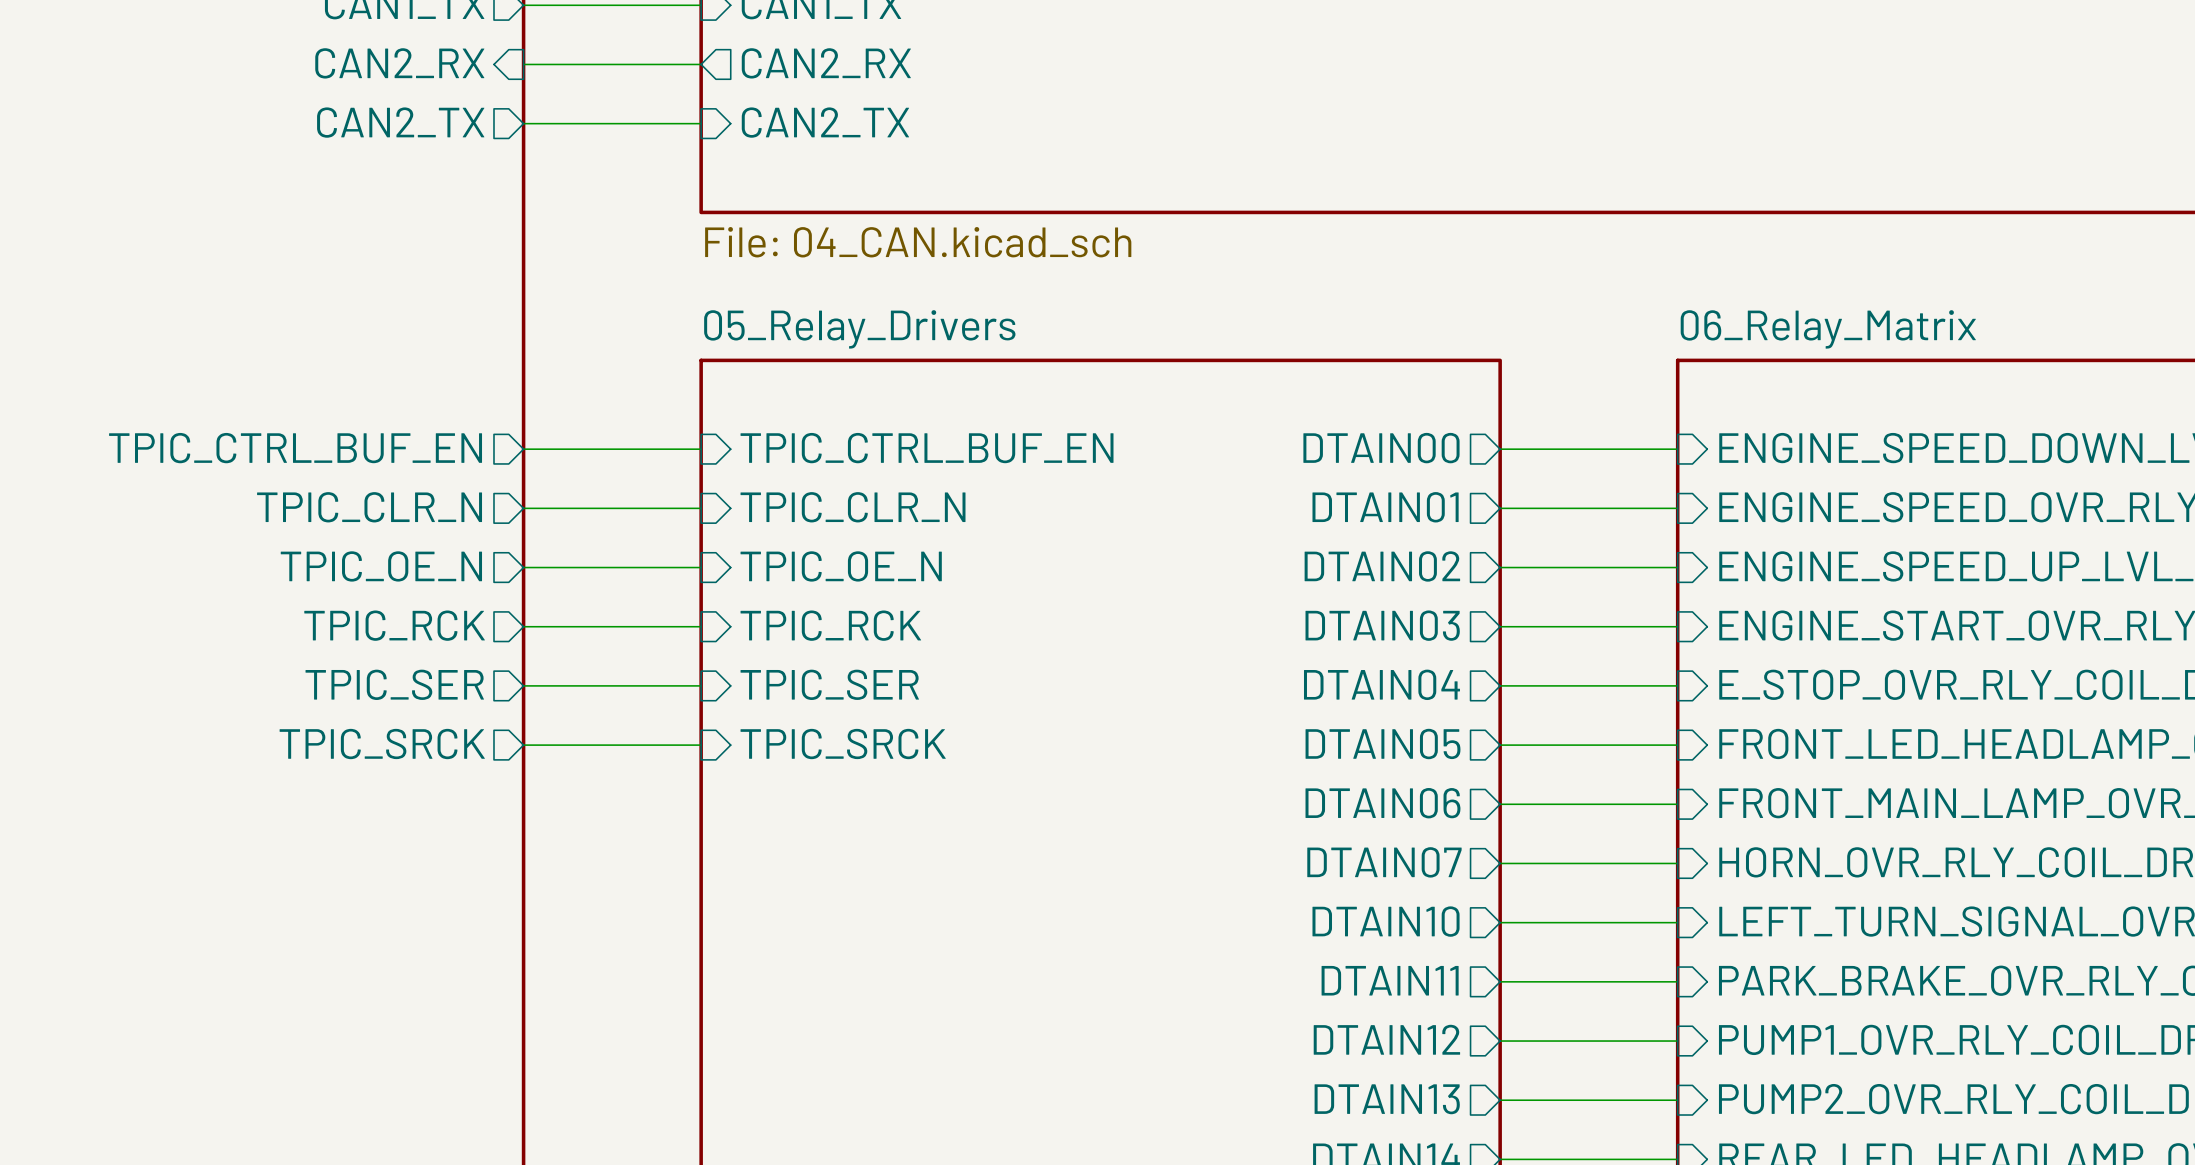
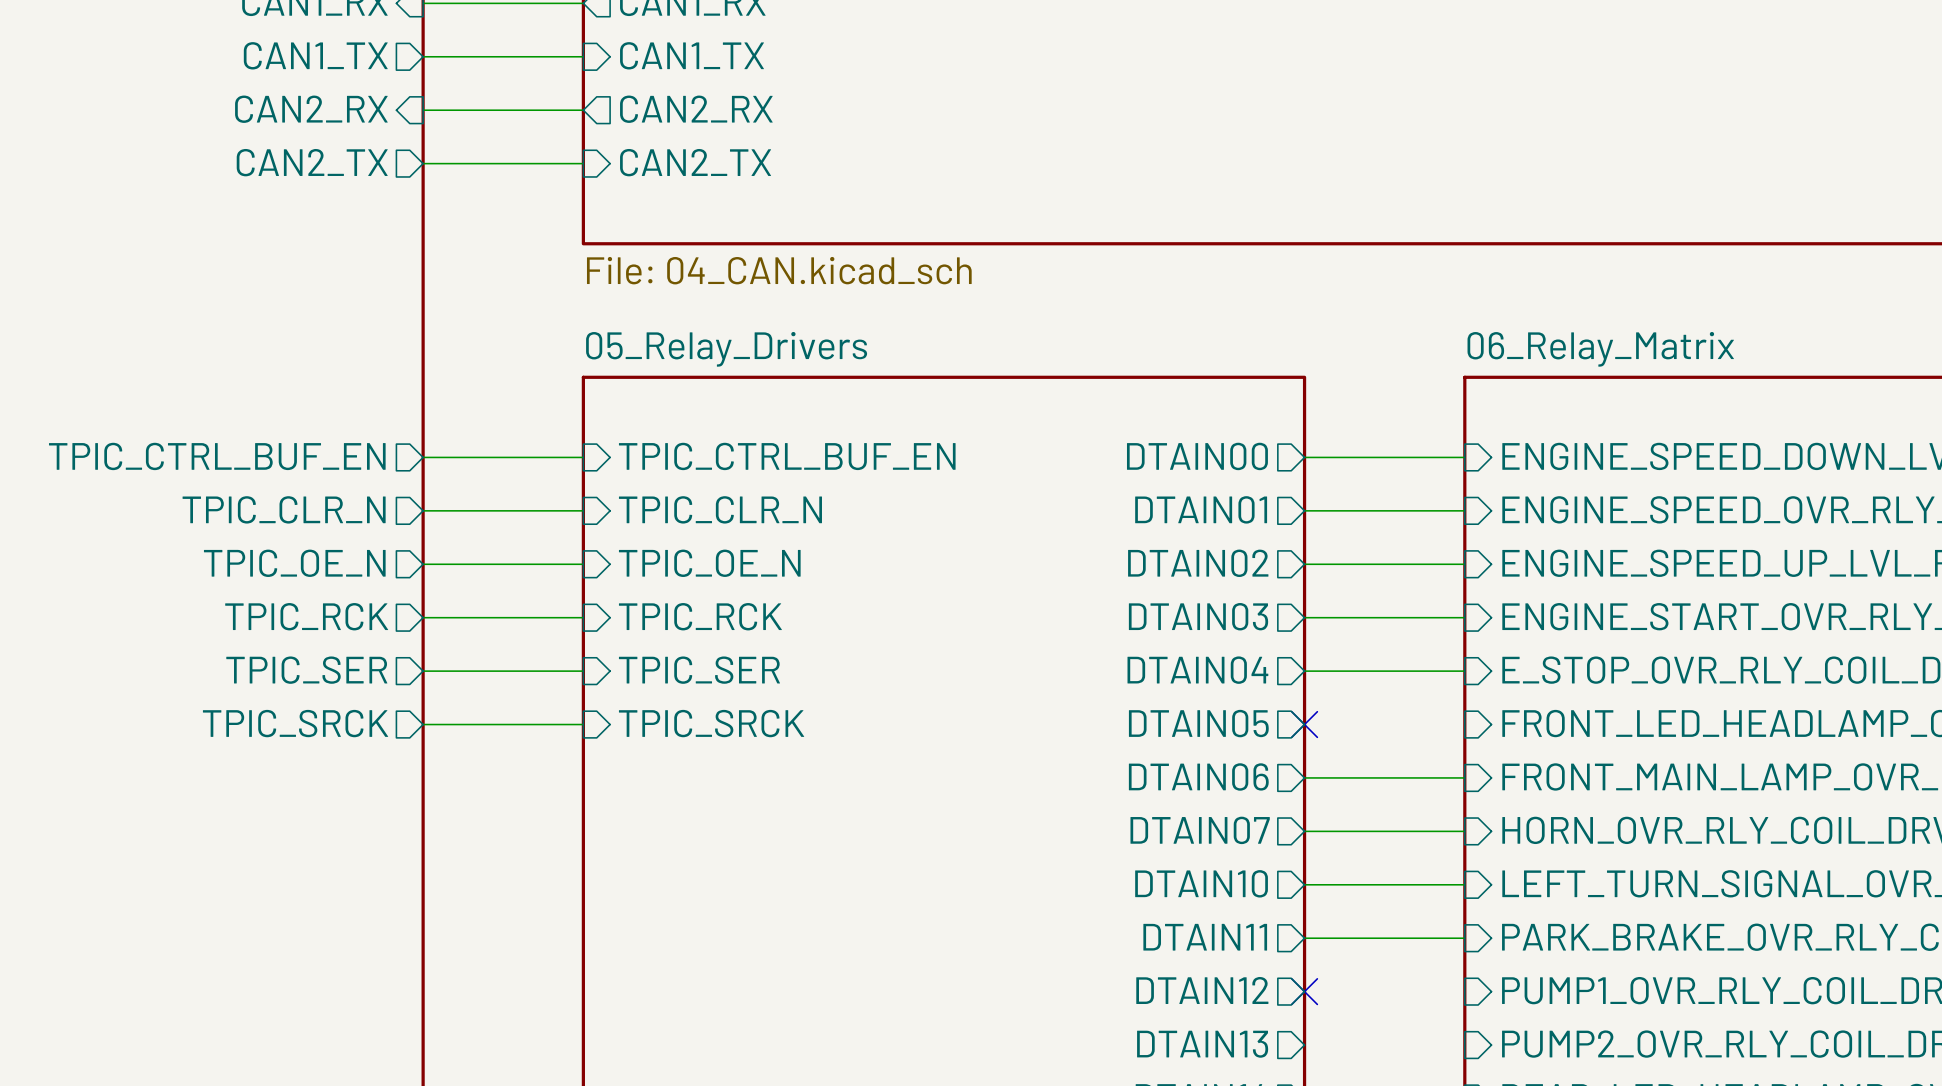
wire: (1500, 745) (1677, 745) -> none
no-connect mark: none -> (1304, 724)
wire: (1500, 1041) (1677, 1041) -> none
no-connect mark: none -> (1304, 991)
wire: (1500, 1100) (1677, 1100) -> none

